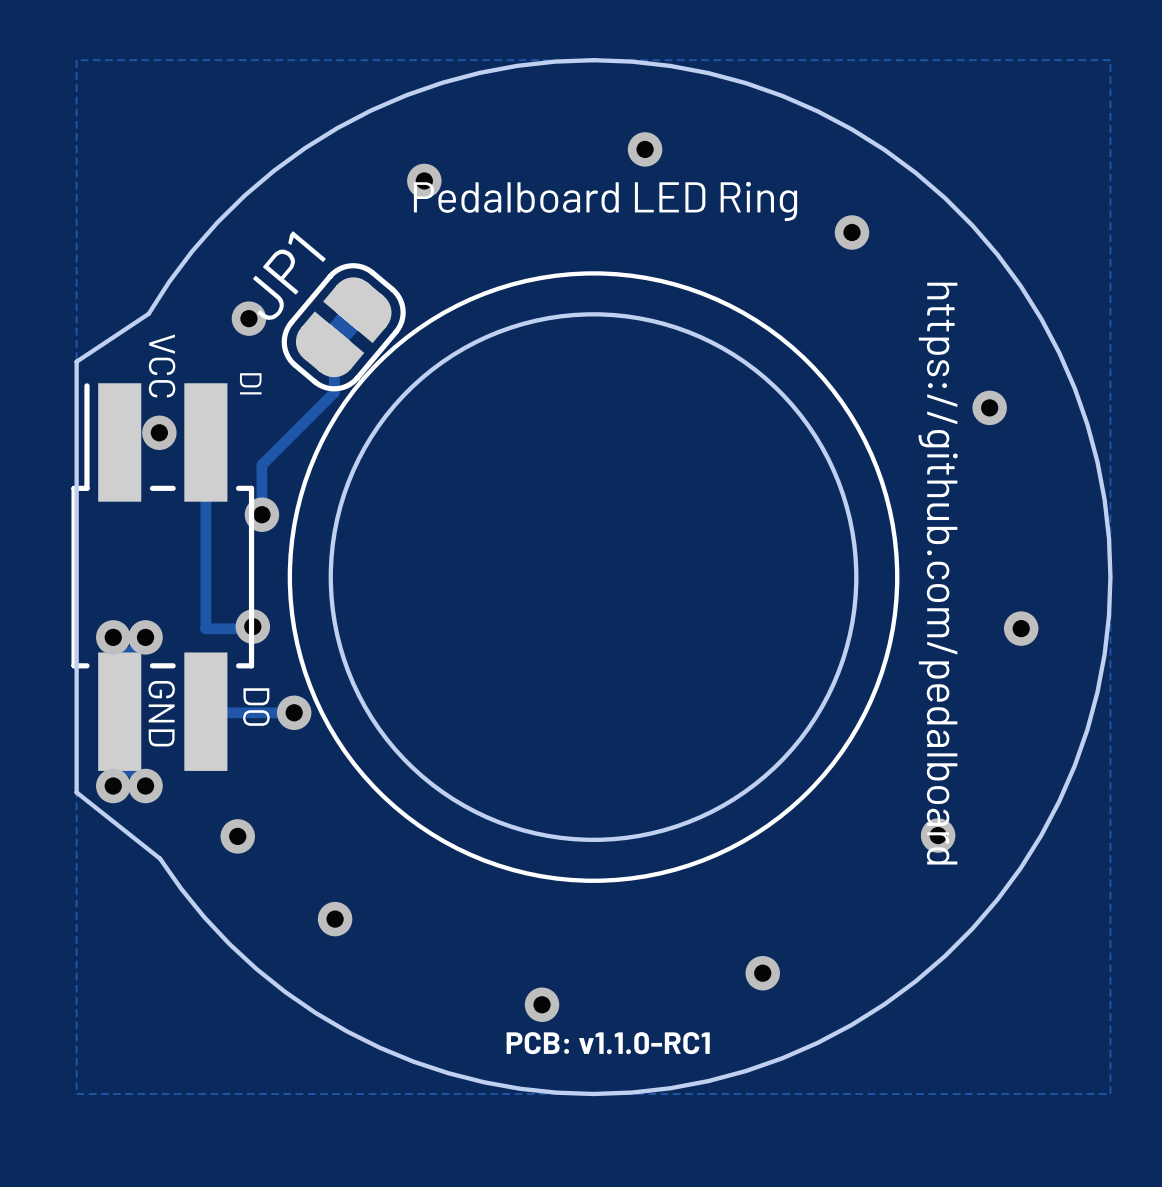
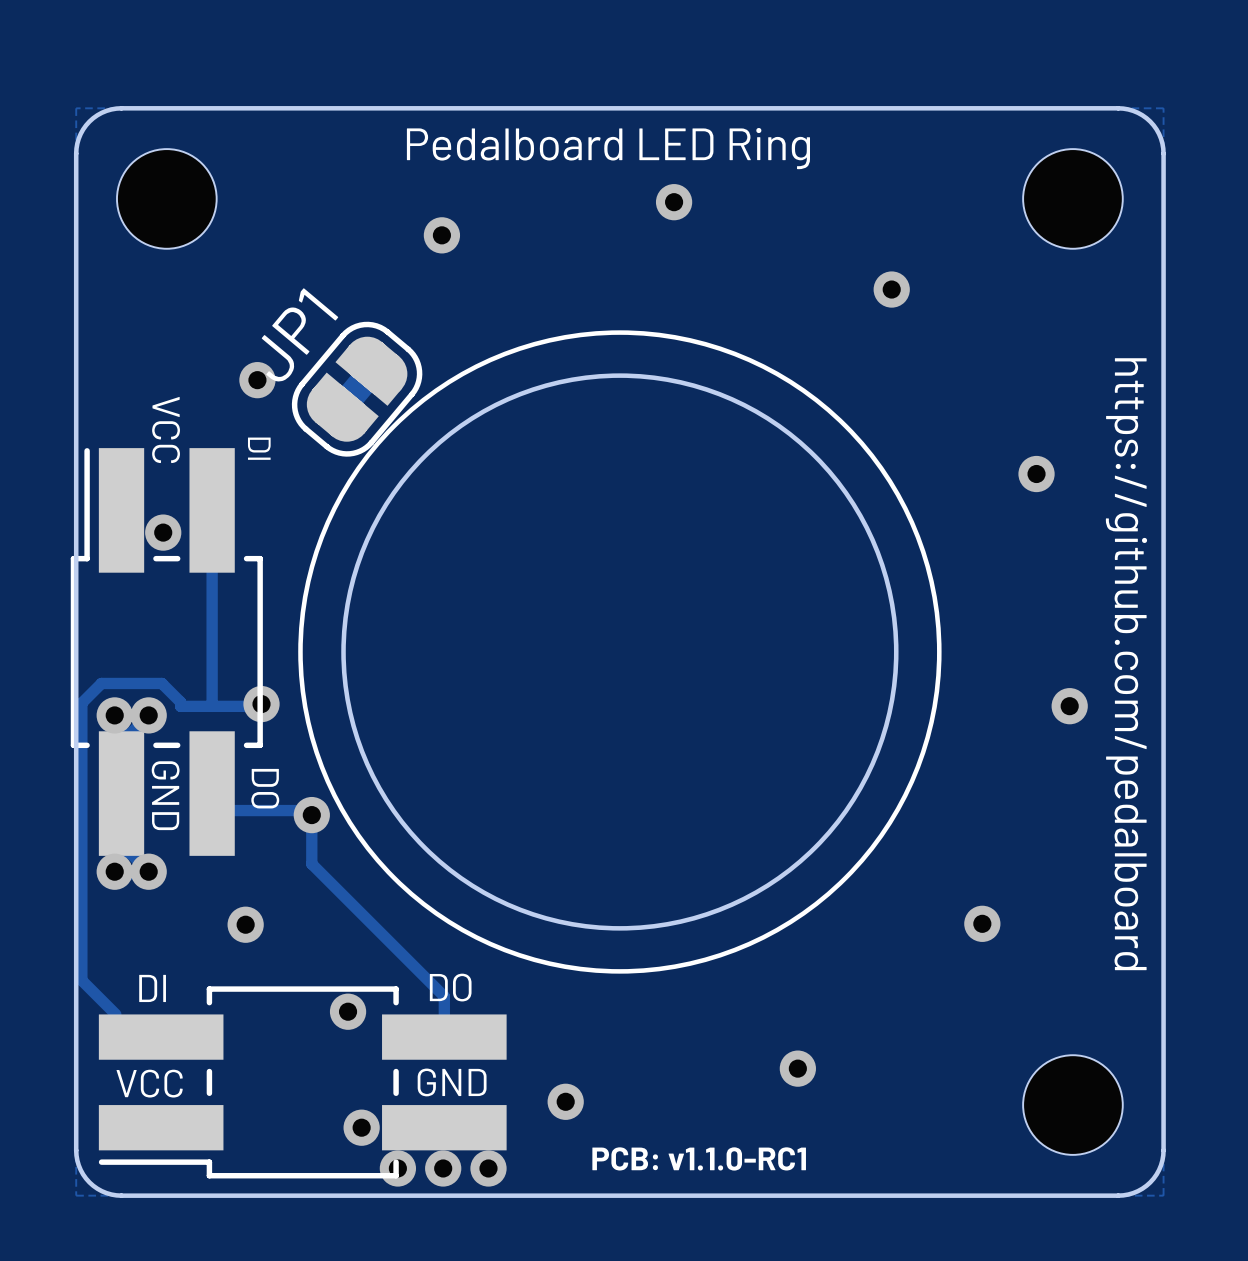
part: none -> (166, 198)
part: none -> (1072, 198)
text position: Pedalboard LED Ring (605, 201) -> Pedalboard LED Ring (608, 148)
track: (334, 348) (334, 392) (261, 465) (261, 514) -> none
board edge: (76, 361) (148, 313) (192, 251) (244, 195) (304, 148) (371, 110) (406, 95) (479, 72) (555, 61) (632, 61) (708, 73) (782, 95) (852, 129) (915, 172) (945, 198) (997, 254) (1041, 318) (1074, 388) (1097, 462) (1109, 538) (1110, 577) (1109, 615) (1097, 692) (1074, 765) (1041, 835) (997, 899) (945, 956) (915, 981) (852, 1024) (782, 1058) (708, 1081) (632, 1092) (556, 1092) (520, 1088) (448, 1073) (379, 1047) (315, 1012) (256, 968) (204, 917) (160, 858) (76, 792) -> (76, 425) (76, 148) (80, 133) (89, 121) (97, 115) (111, 109) (1118, 108) (1133, 110) (1146, 118) (1156, 129) (1162, 143) (1163, 1150) (1159, 1170) (1153, 1178) (1142, 1188) (1128, 1194) (1118, 1195) (121, 1195) (106, 1193) (97, 1188) (86, 1178) (78, 1165) (76, 1155) (76, 878)
via position: (159, 432) -> (163, 532)
via: (261, 514) -> none
text position: https://github.com/pedalboard (938, 573) -> https://github.com/pedalboard (1126, 664)
track: none -> (212, 706) (180, 706) (180, 702) (161, 683) (101, 683) (81, 703) (81, 980) (115, 1014)
track: (205, 711) (294, 712) -> none
via position: (294, 712) -> (311, 815)
track: none -> (229, 810) (307, 810) (311, 815) (311, 864) (444, 996) (444, 1037)
text: none -> DI (152, 988)
text: none -> DO (450, 987)
part: none -> (302, 1082)
text: none -> GND (452, 1082)
text: none -> VCC (149, 1083)
part: none -> (1072, 1105)
via: none -> (361, 1127)
text position: PCB: v1.1.0-RC1 (608, 1043) -> PCB: v1.1.0-RC1 (699, 1158)
via: none -> (397, 1168)
via: none -> (443, 1168)
via: none -> (488, 1168)

